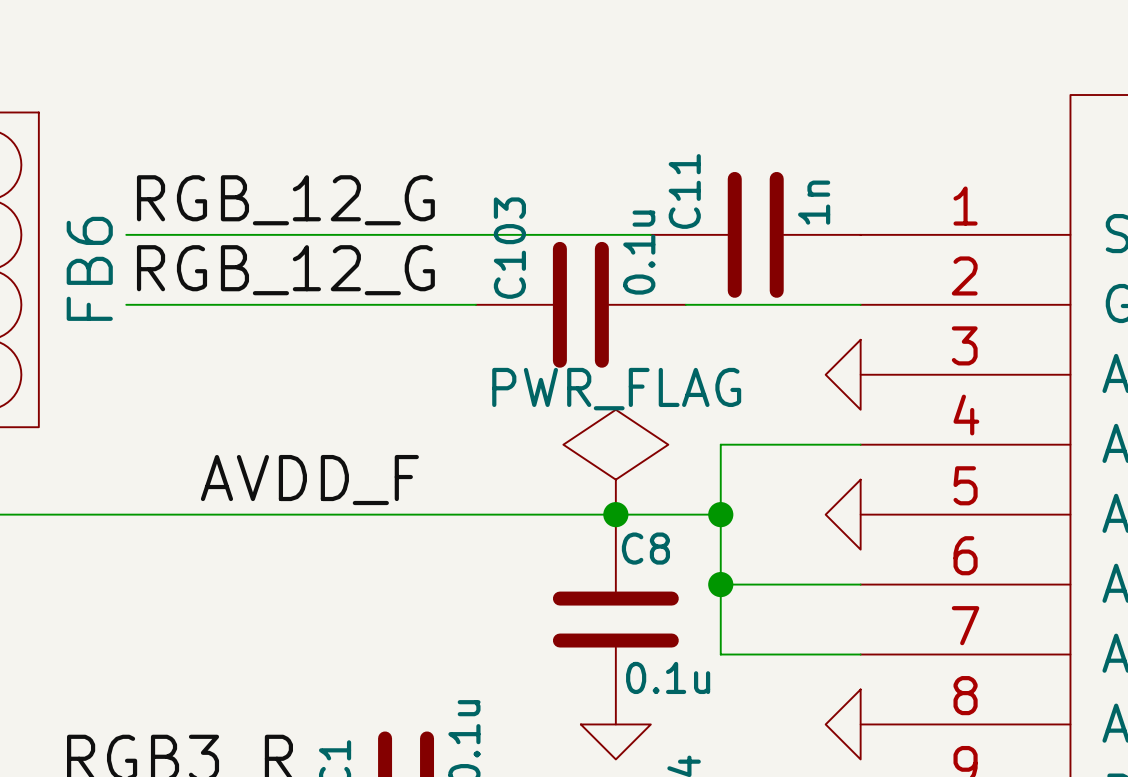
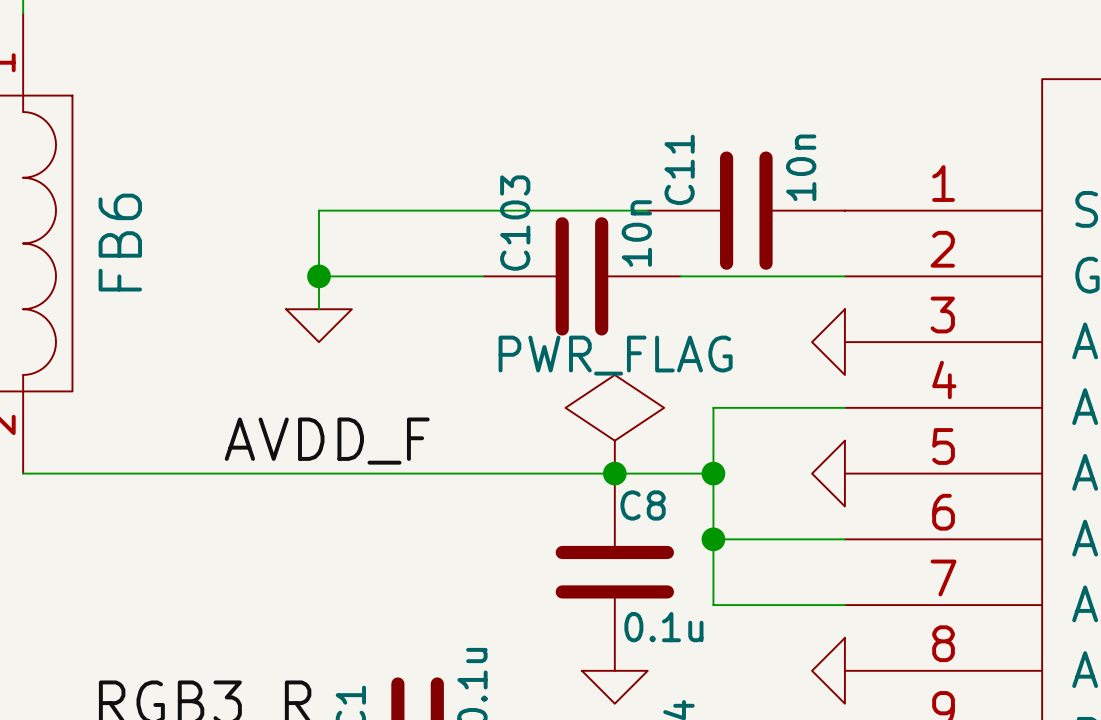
label: RGB_12_G (285, 200) -> none
C11 value: 1n (814, 202) -> 10n (801, 167)
wire: (126, 234) (301, 234) -> (318, 309) (318, 210)
C103 value: 0.1u (639, 252) -> 10n (636, 233)
label: RGB_12_G (285, 270) -> none
wire: (126, 304) (301, 304) -> none
junction: none -> (318, 276)
power symbol: none -> (318, 325)

